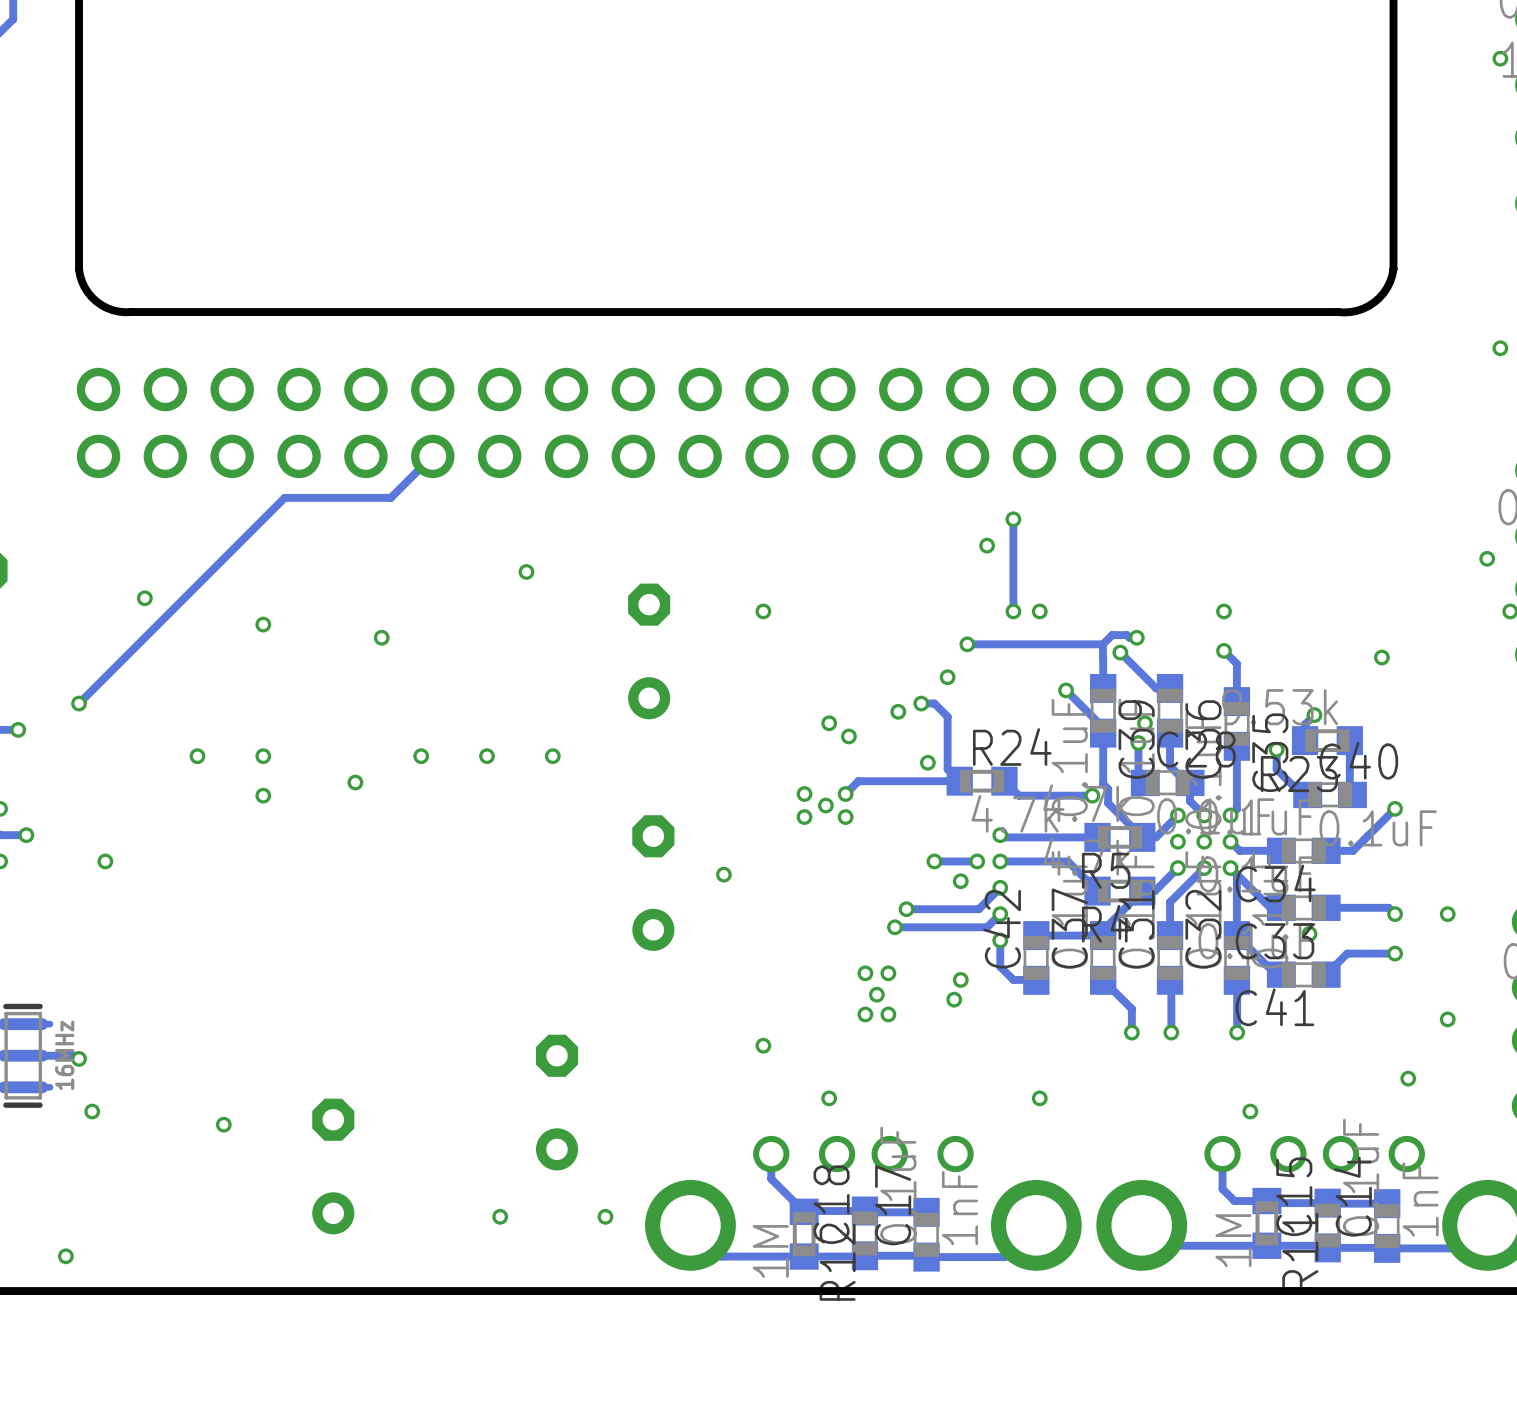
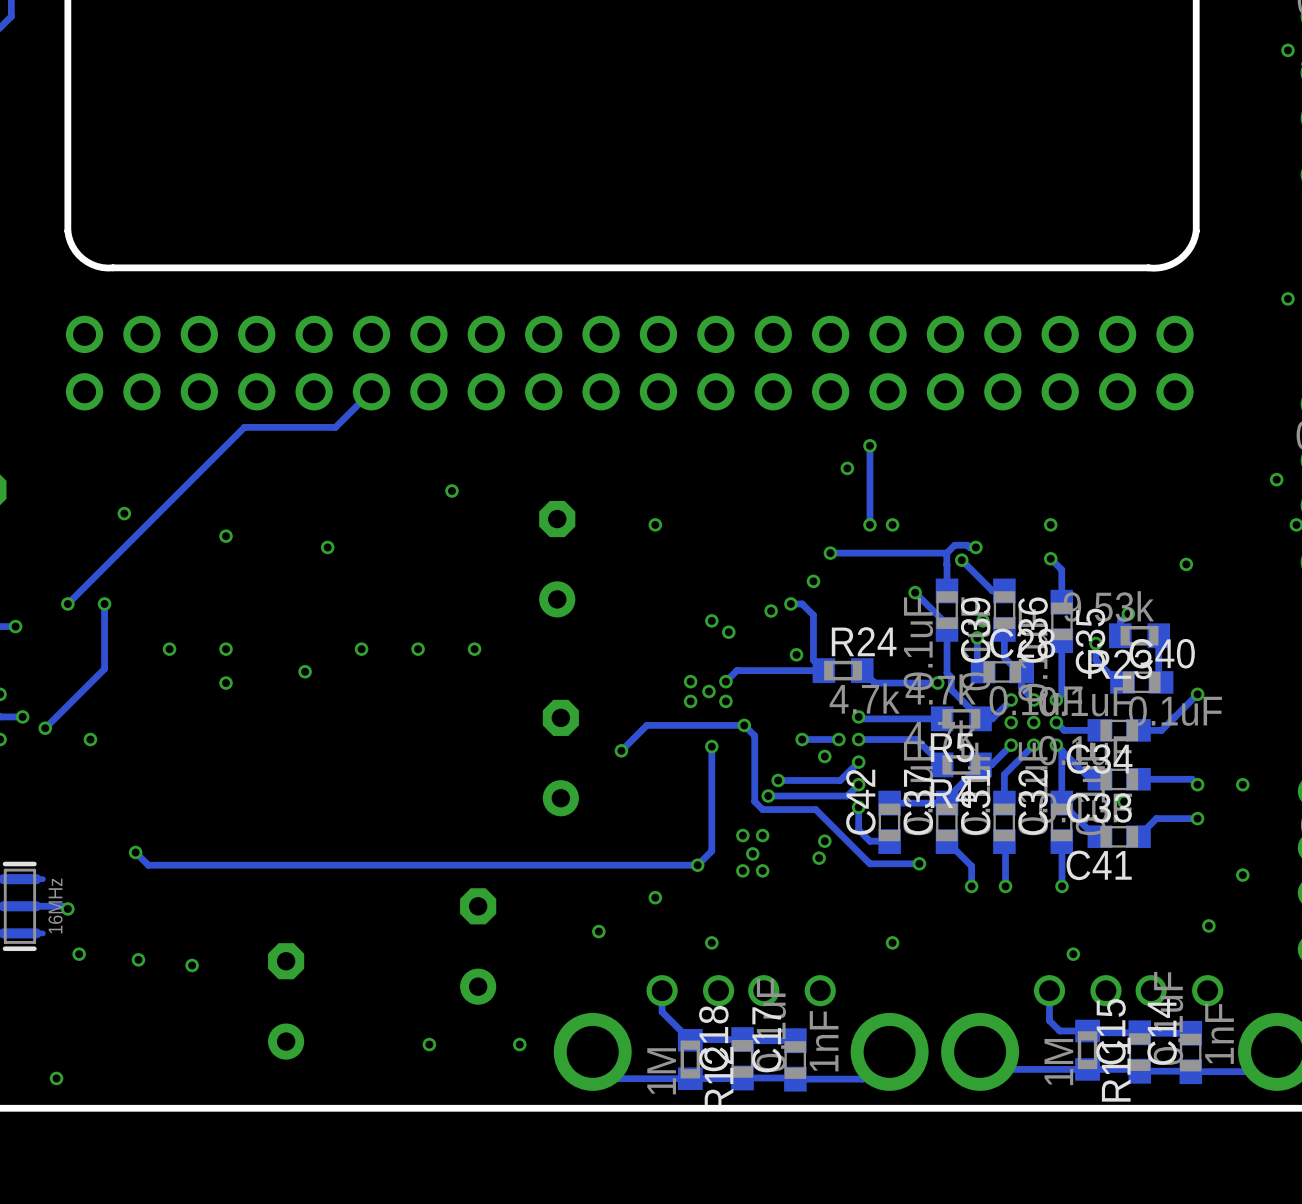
track: none -> (104, 603) (104, 668) (45, 728)
via: none -> (104, 603)
via: none -> (744, 725)
via: none -> (45, 728)
track: none -> (711, 746) (711, 851) (697, 865) (148, 865) (135, 852)
via: none -> (711, 746)
track: none -> (621, 750) (646, 725) (744, 725) (754, 735) (754, 801) (762, 809) (815, 809) (869, 863) (919, 863)
via: none -> (135, 852)
via: none -> (919, 863)
via: none -> (697, 865)
via: none -> (598, 931)
via: none -> (138, 959)

